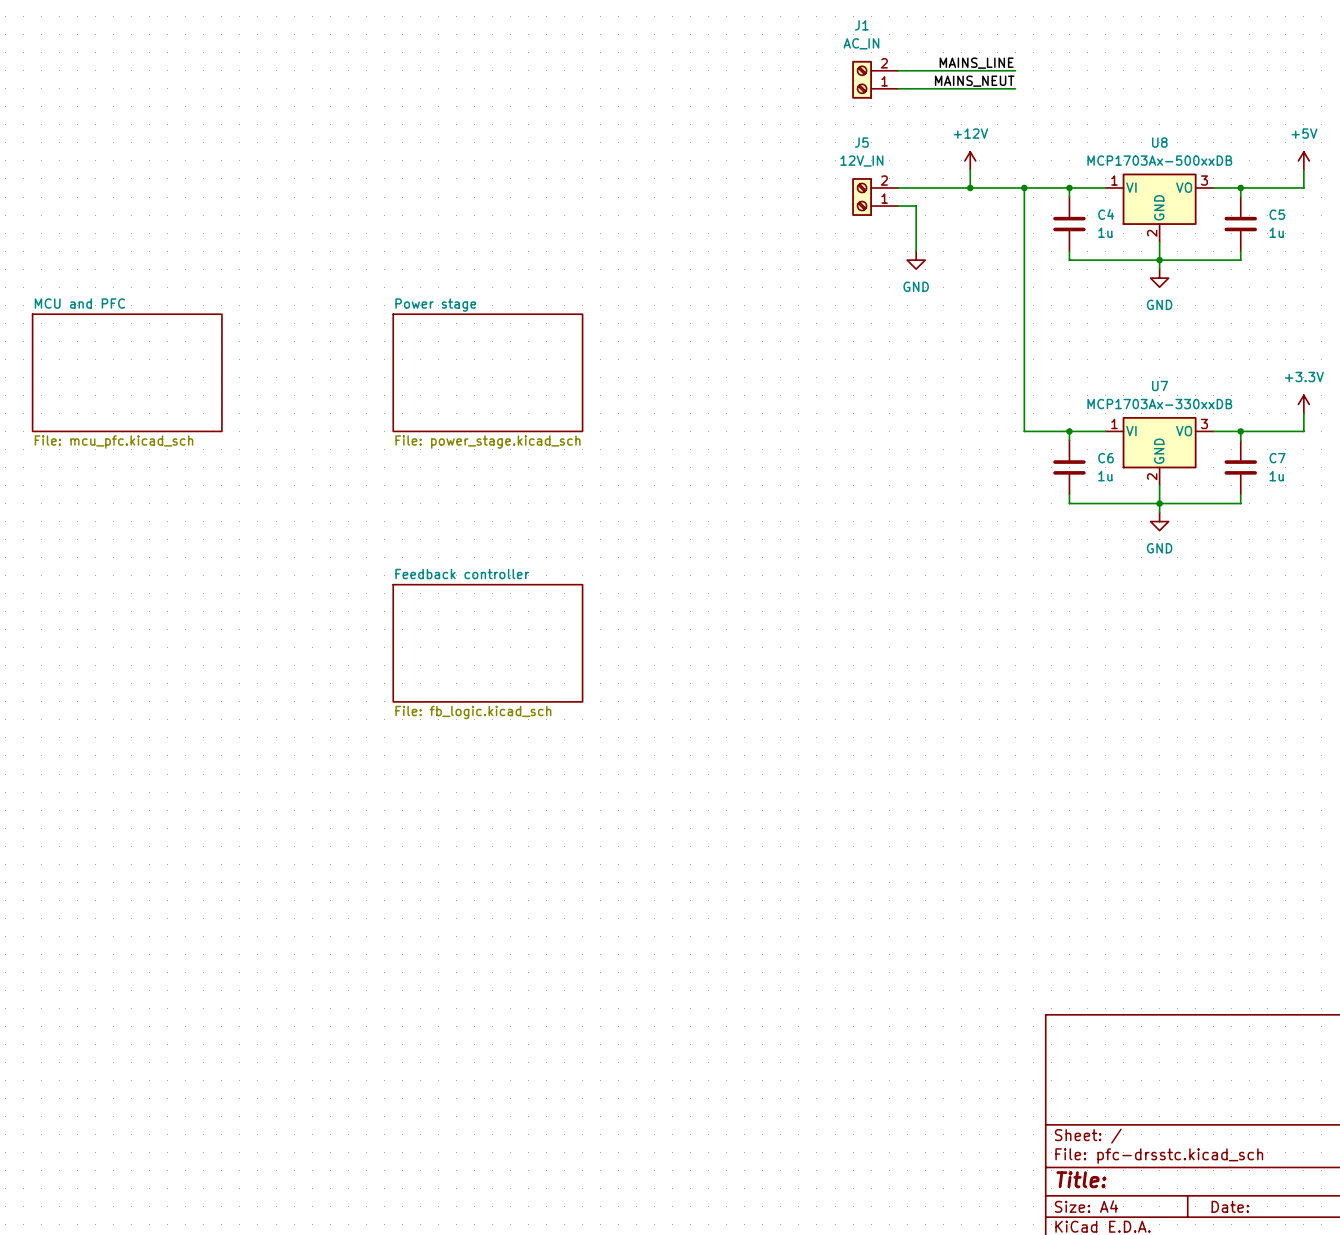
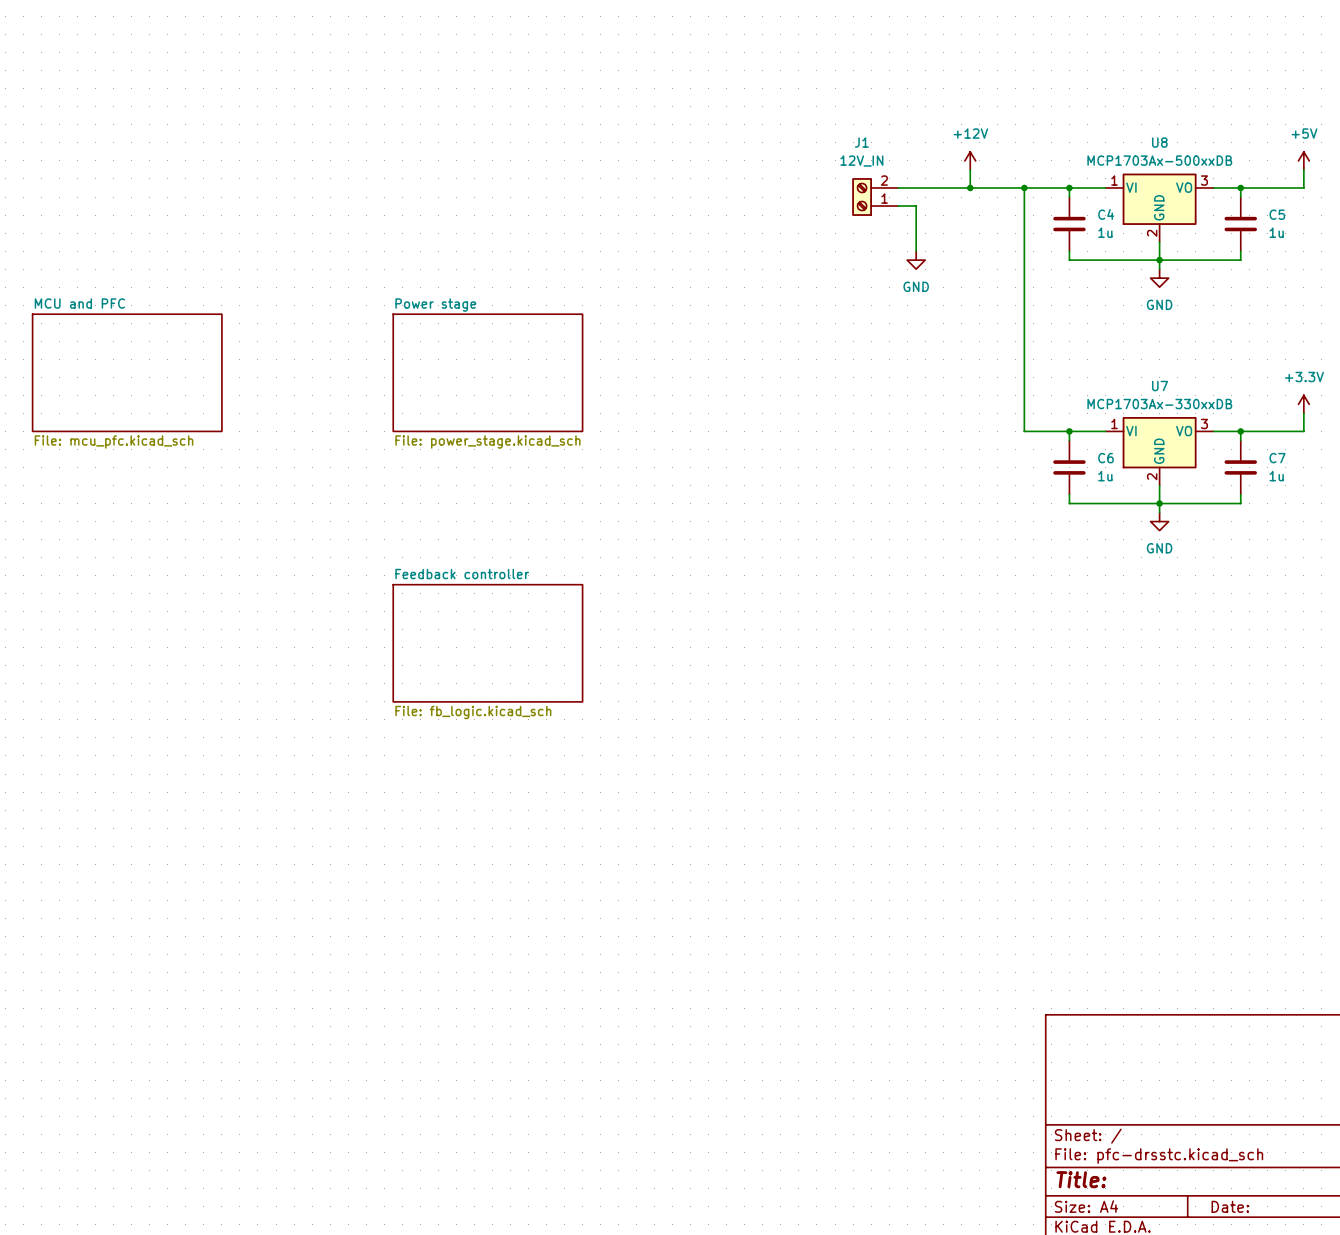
label: MAINS_LINE (976, 63) -> none
wire: (898, 70) (1015, 70) -> none
J1: AC_IN (875, 79) -> none
label: MAINS_NEUT (974, 81) -> none
wire: (898, 88) (1015, 88) -> none
J5 name: J5 (861, 142) -> J1 (861, 142)

